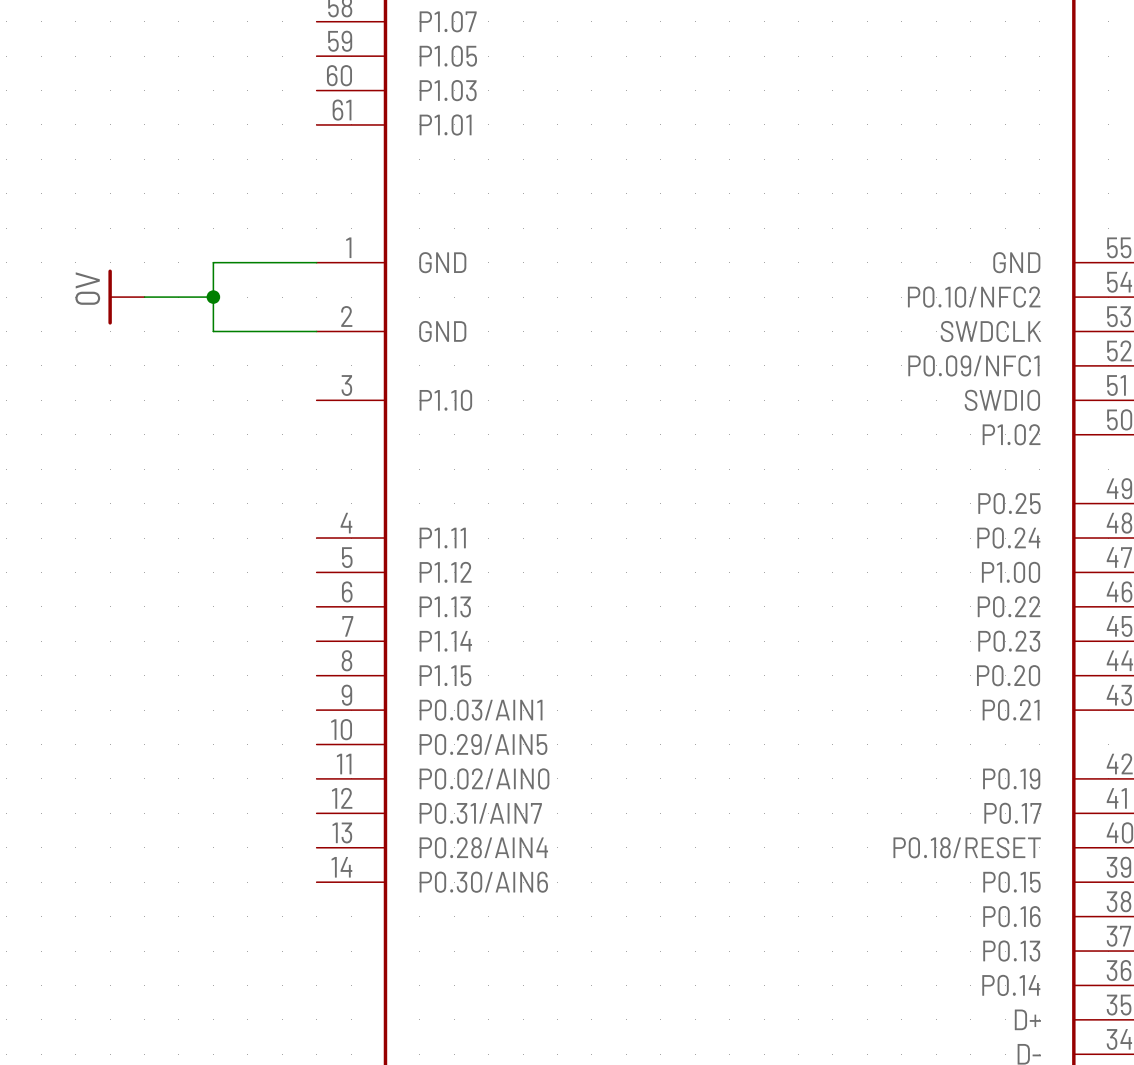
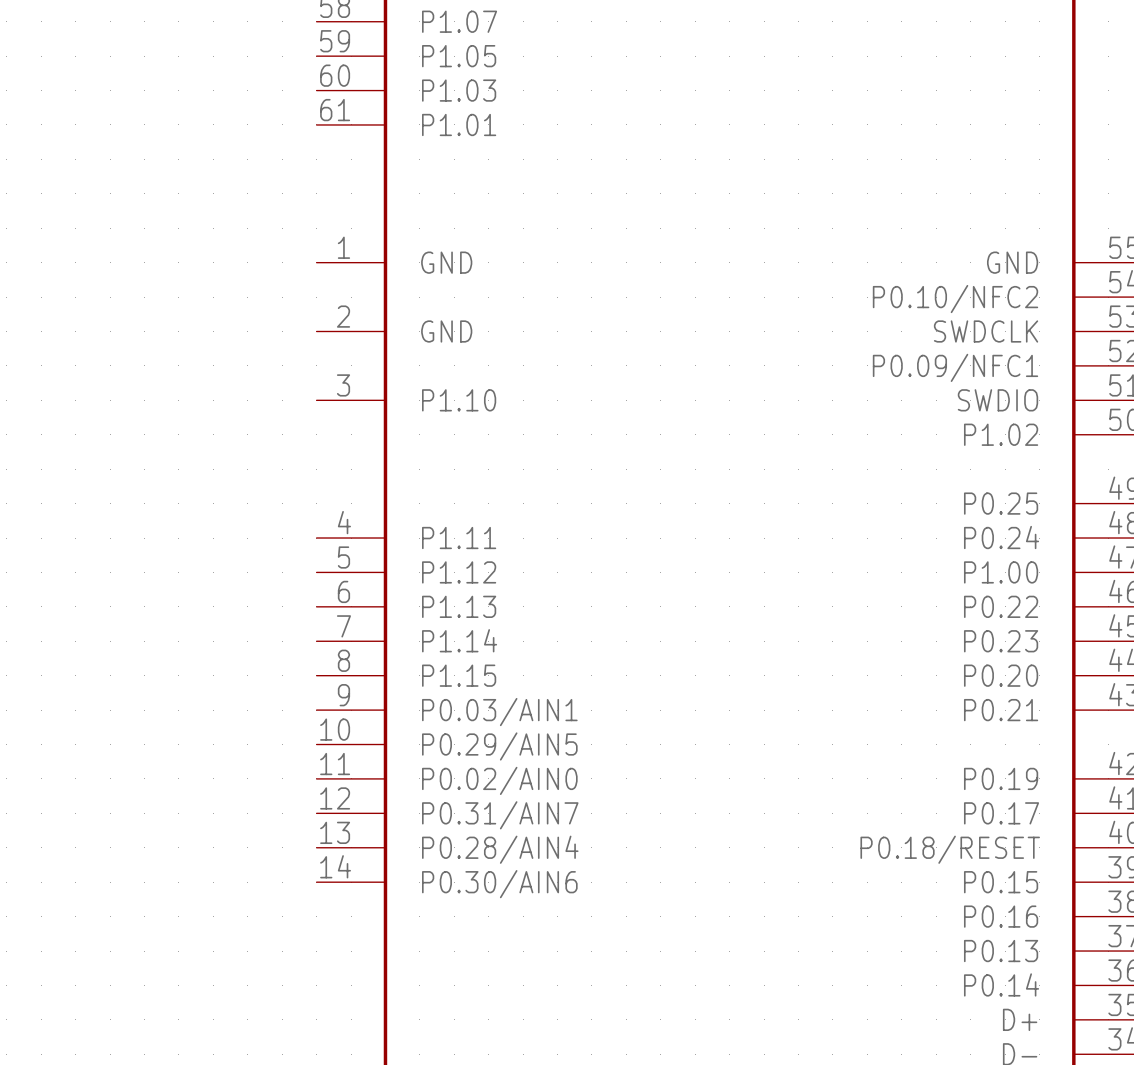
wire: (316, 262) (213, 262) (213, 331) (316, 331) -> none
power symbol: 0V (126, 297) -> none
wire: (144, 297) (213, 297) -> none
junction: (213, 297) -> none

